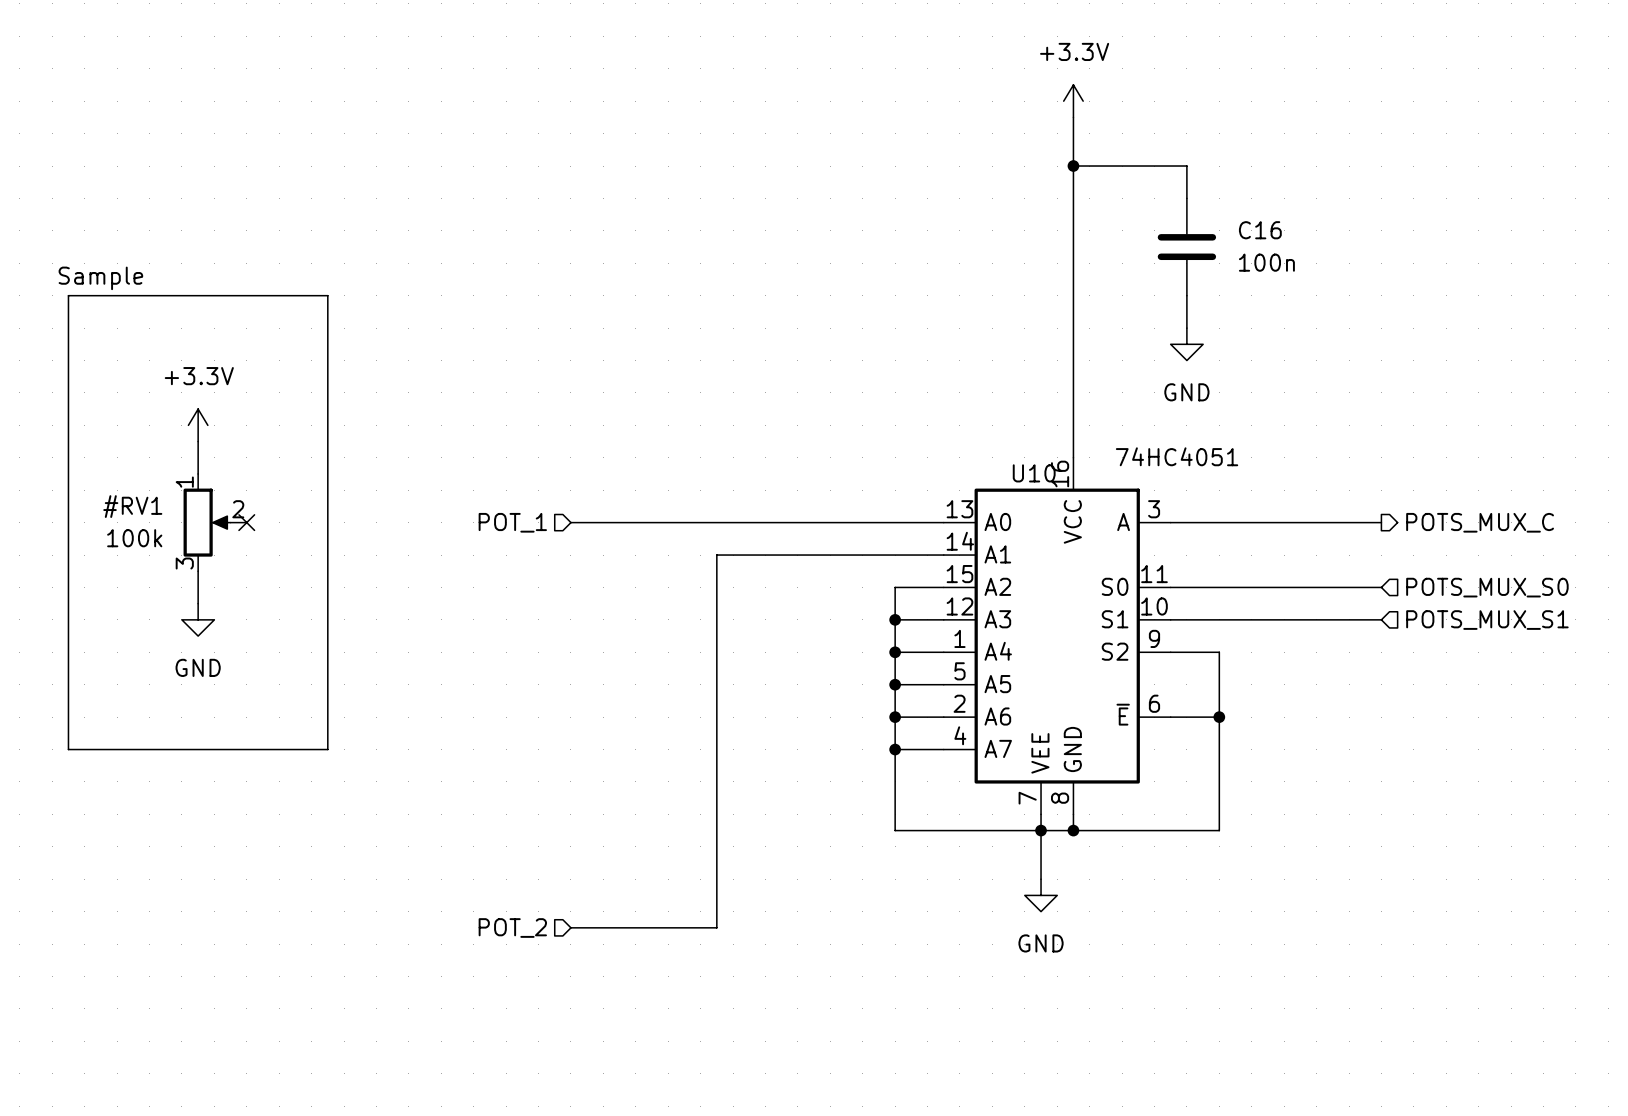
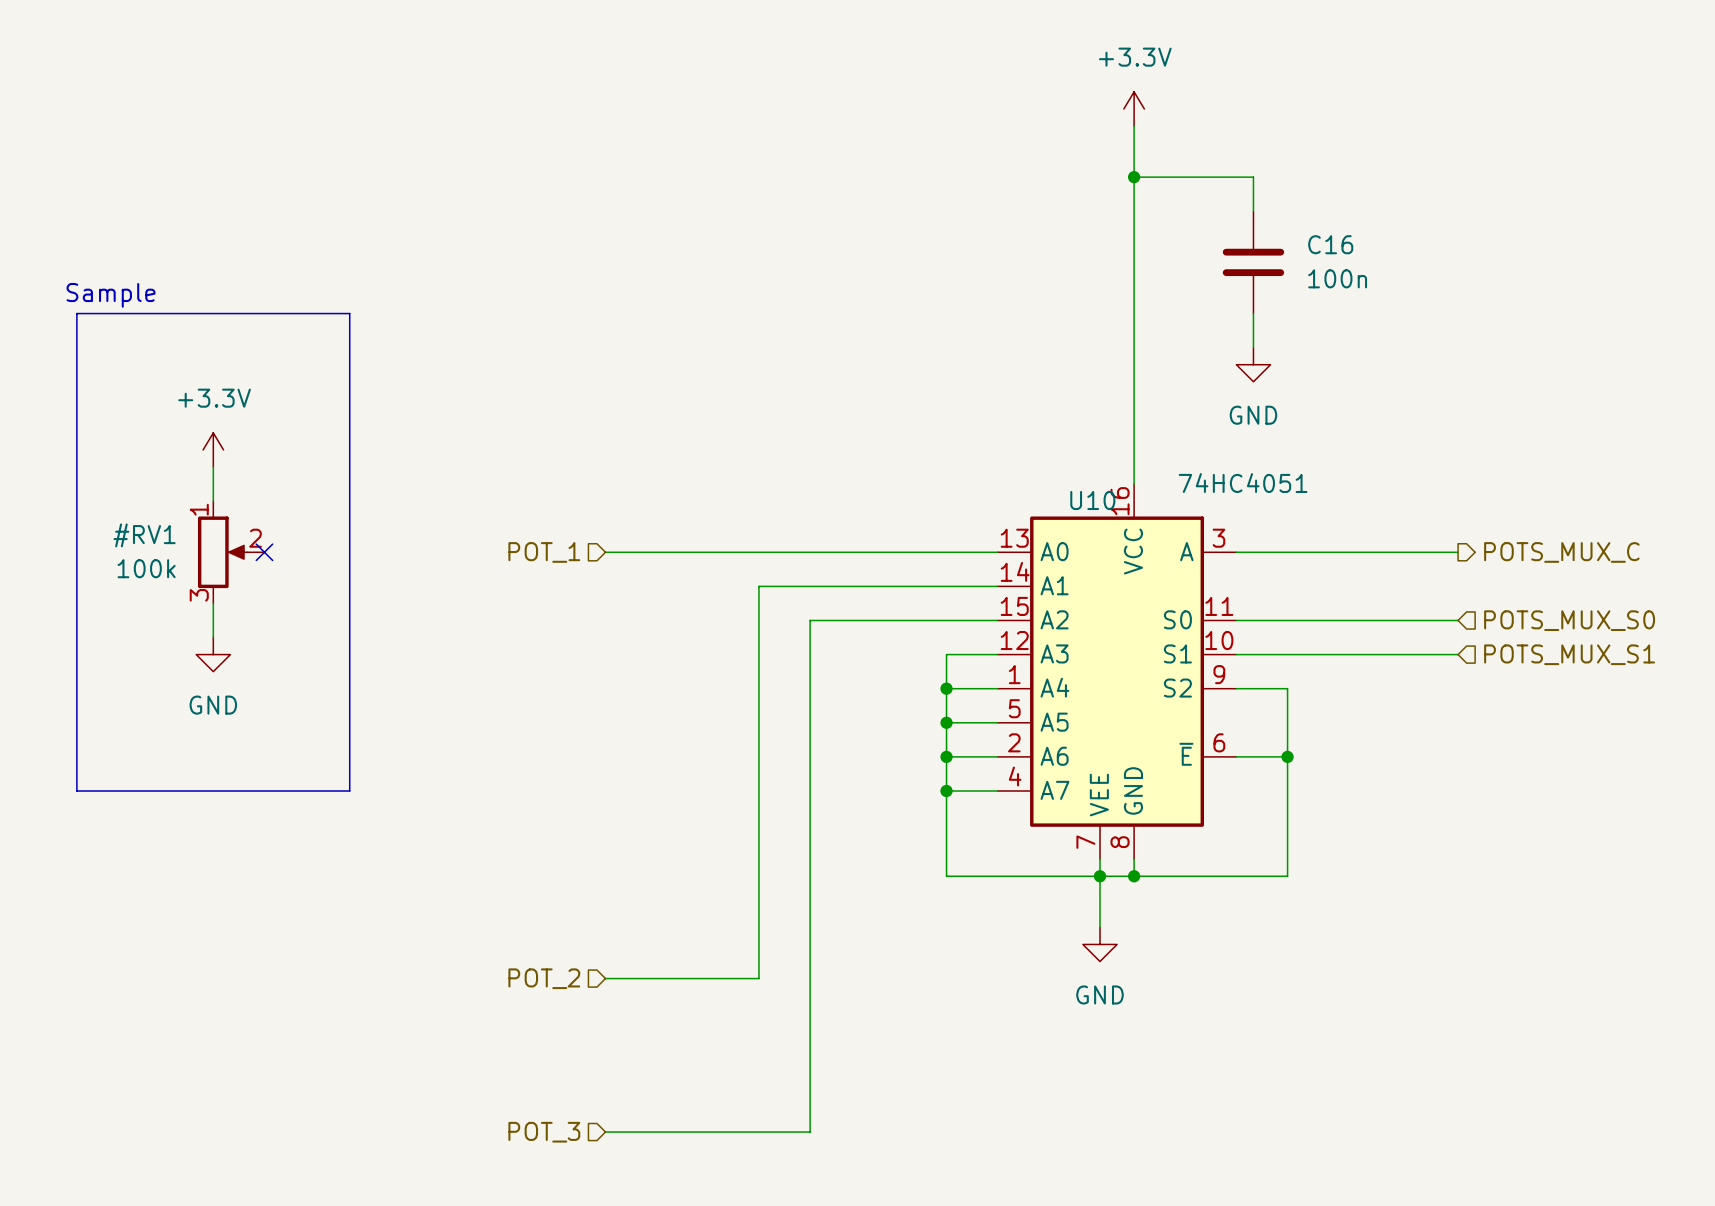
wire: (895, 587) (895, 619) -> (946, 620) (810, 620) (810, 1132) (605, 1132)
junction: (895, 619) -> none
hierarchical label: none -> POT_3 (544, 1132)

